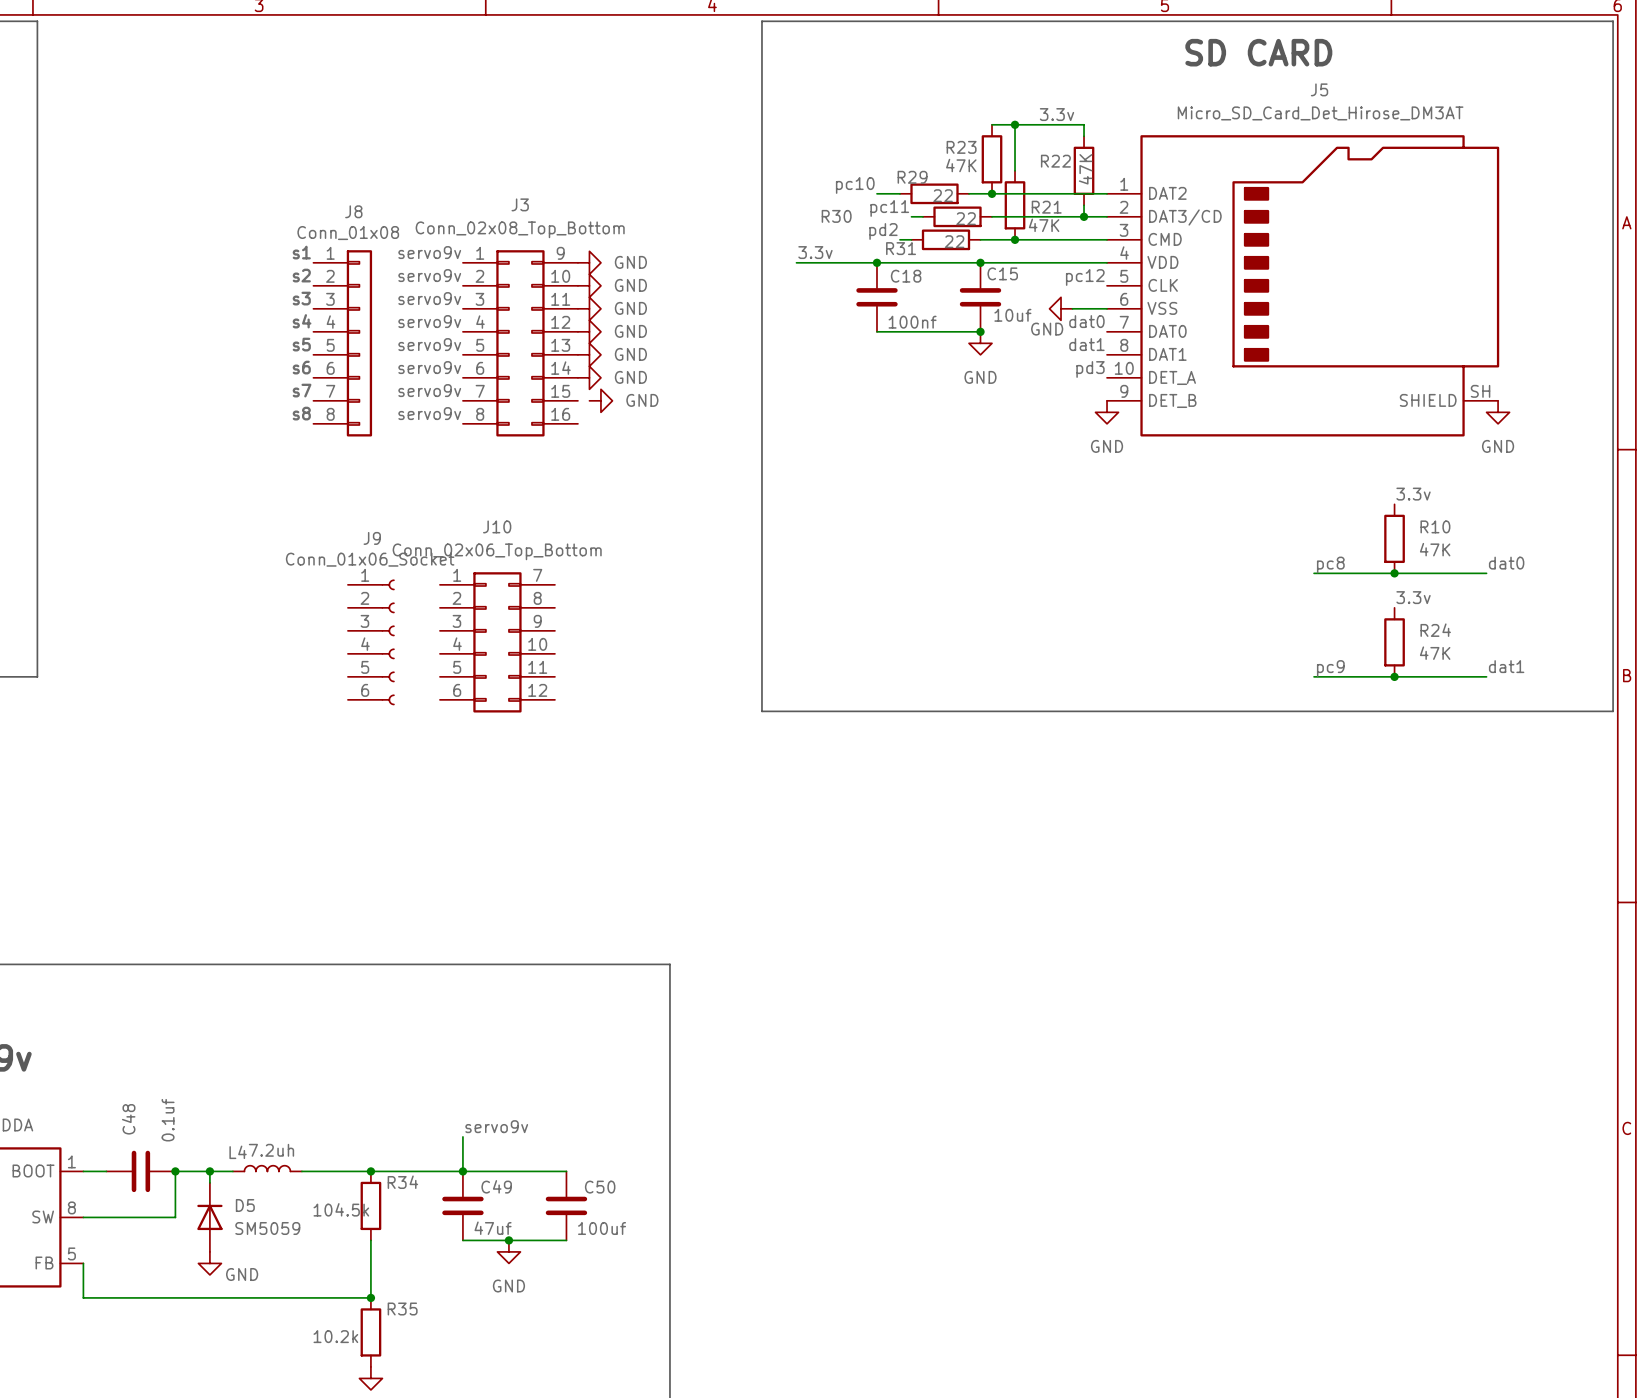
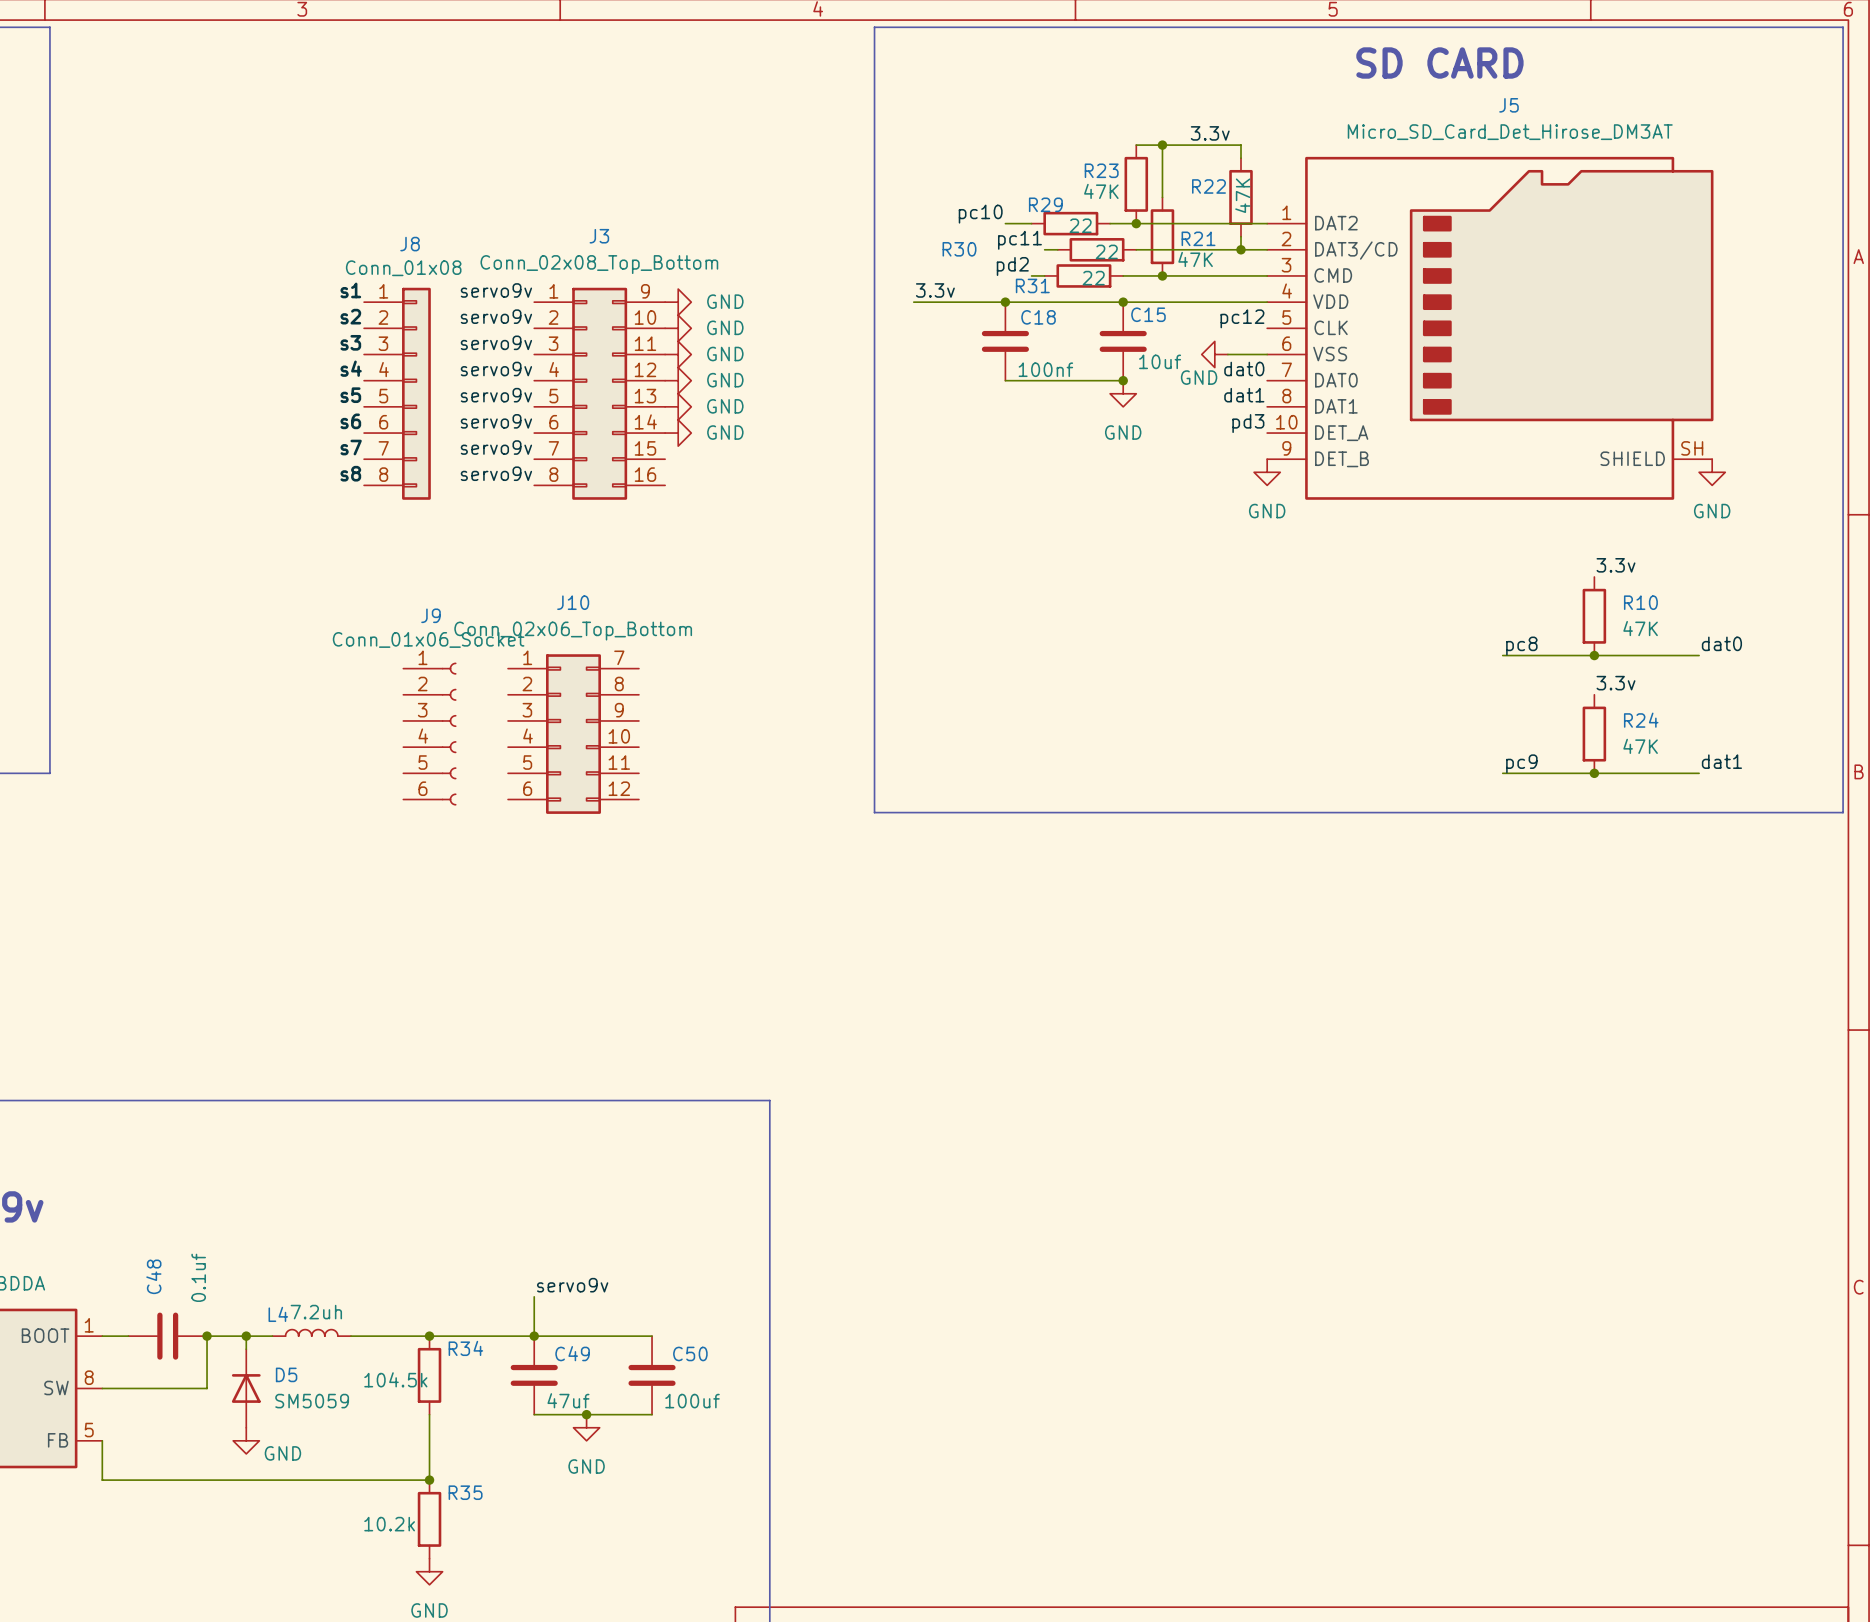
power symbol: GND (600, 400) -> none

